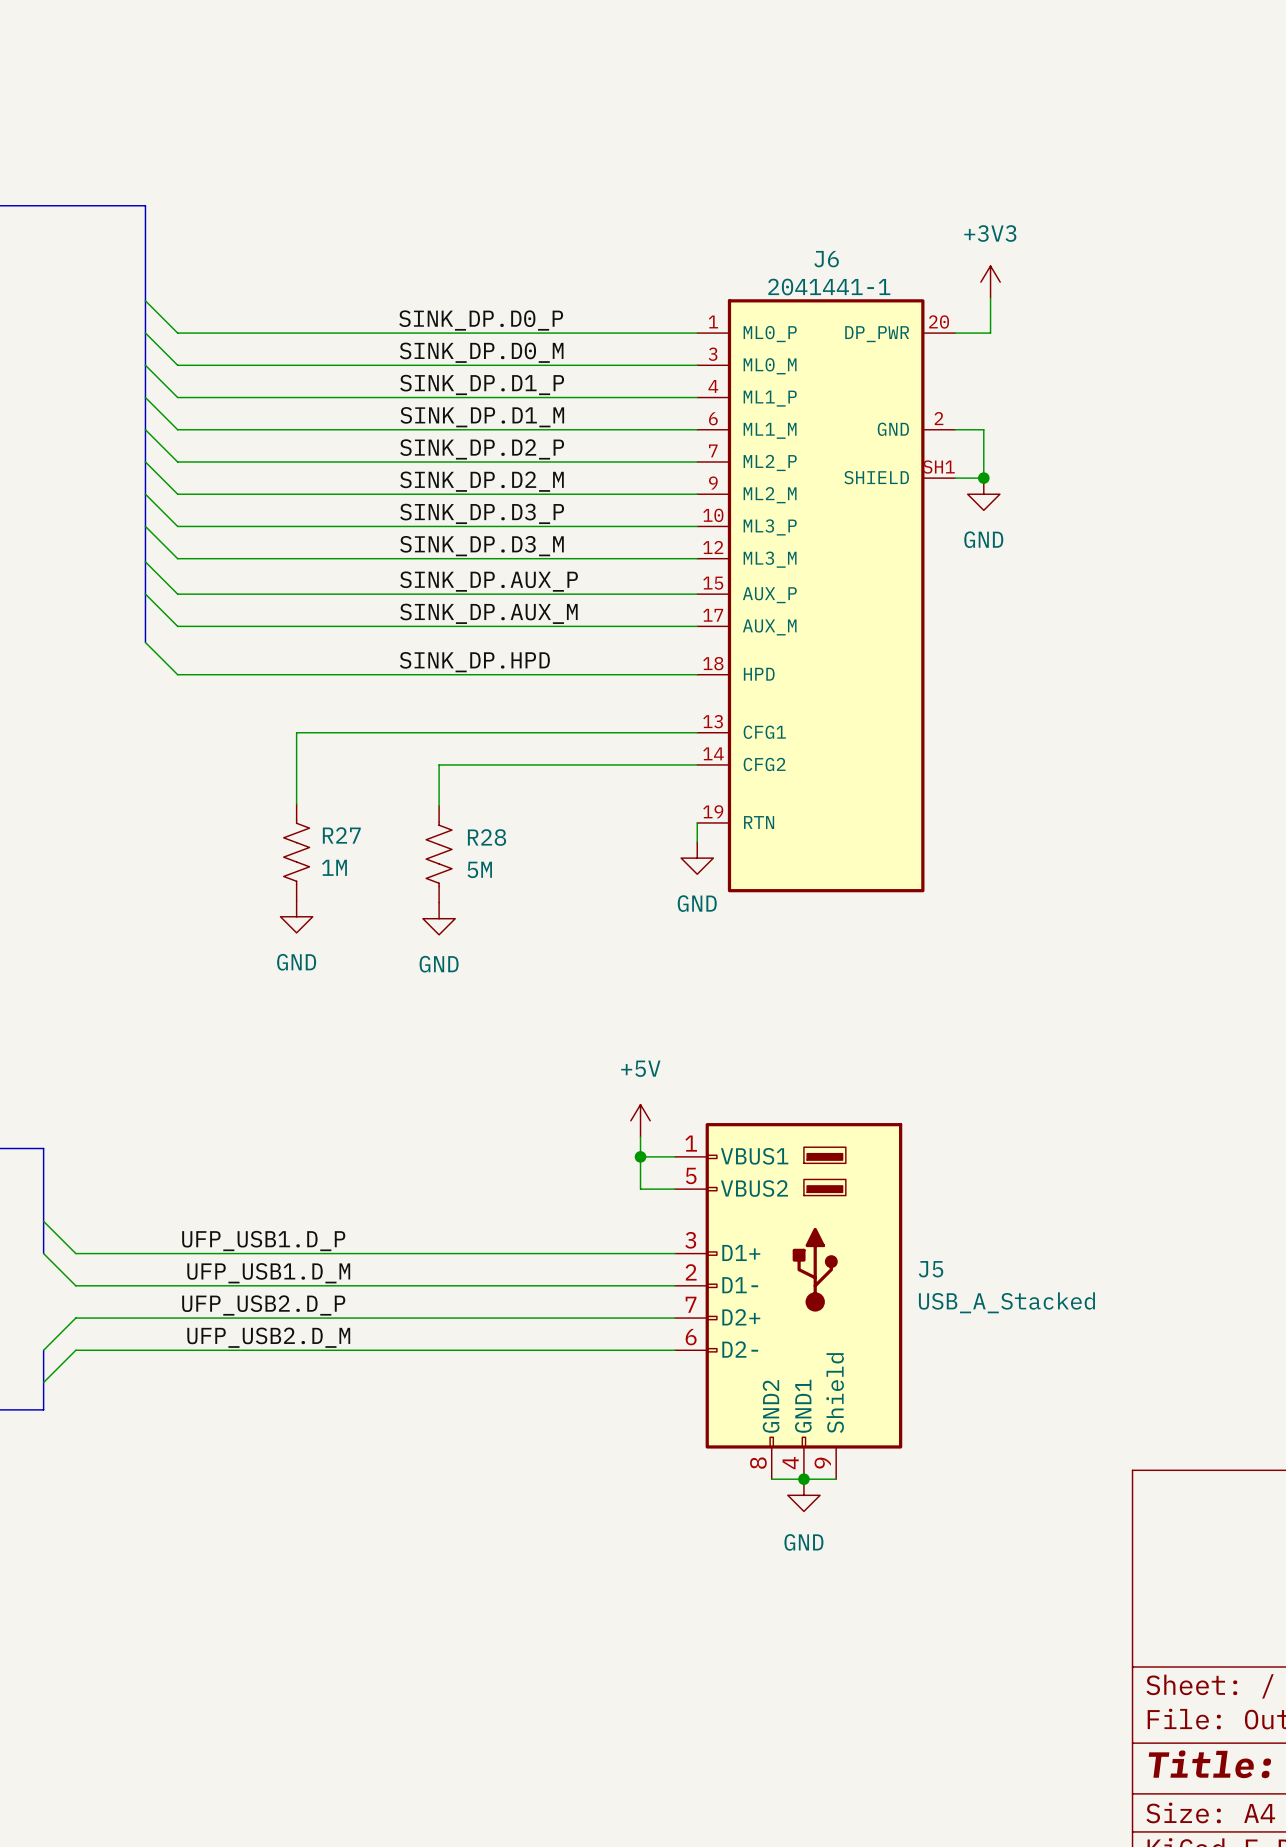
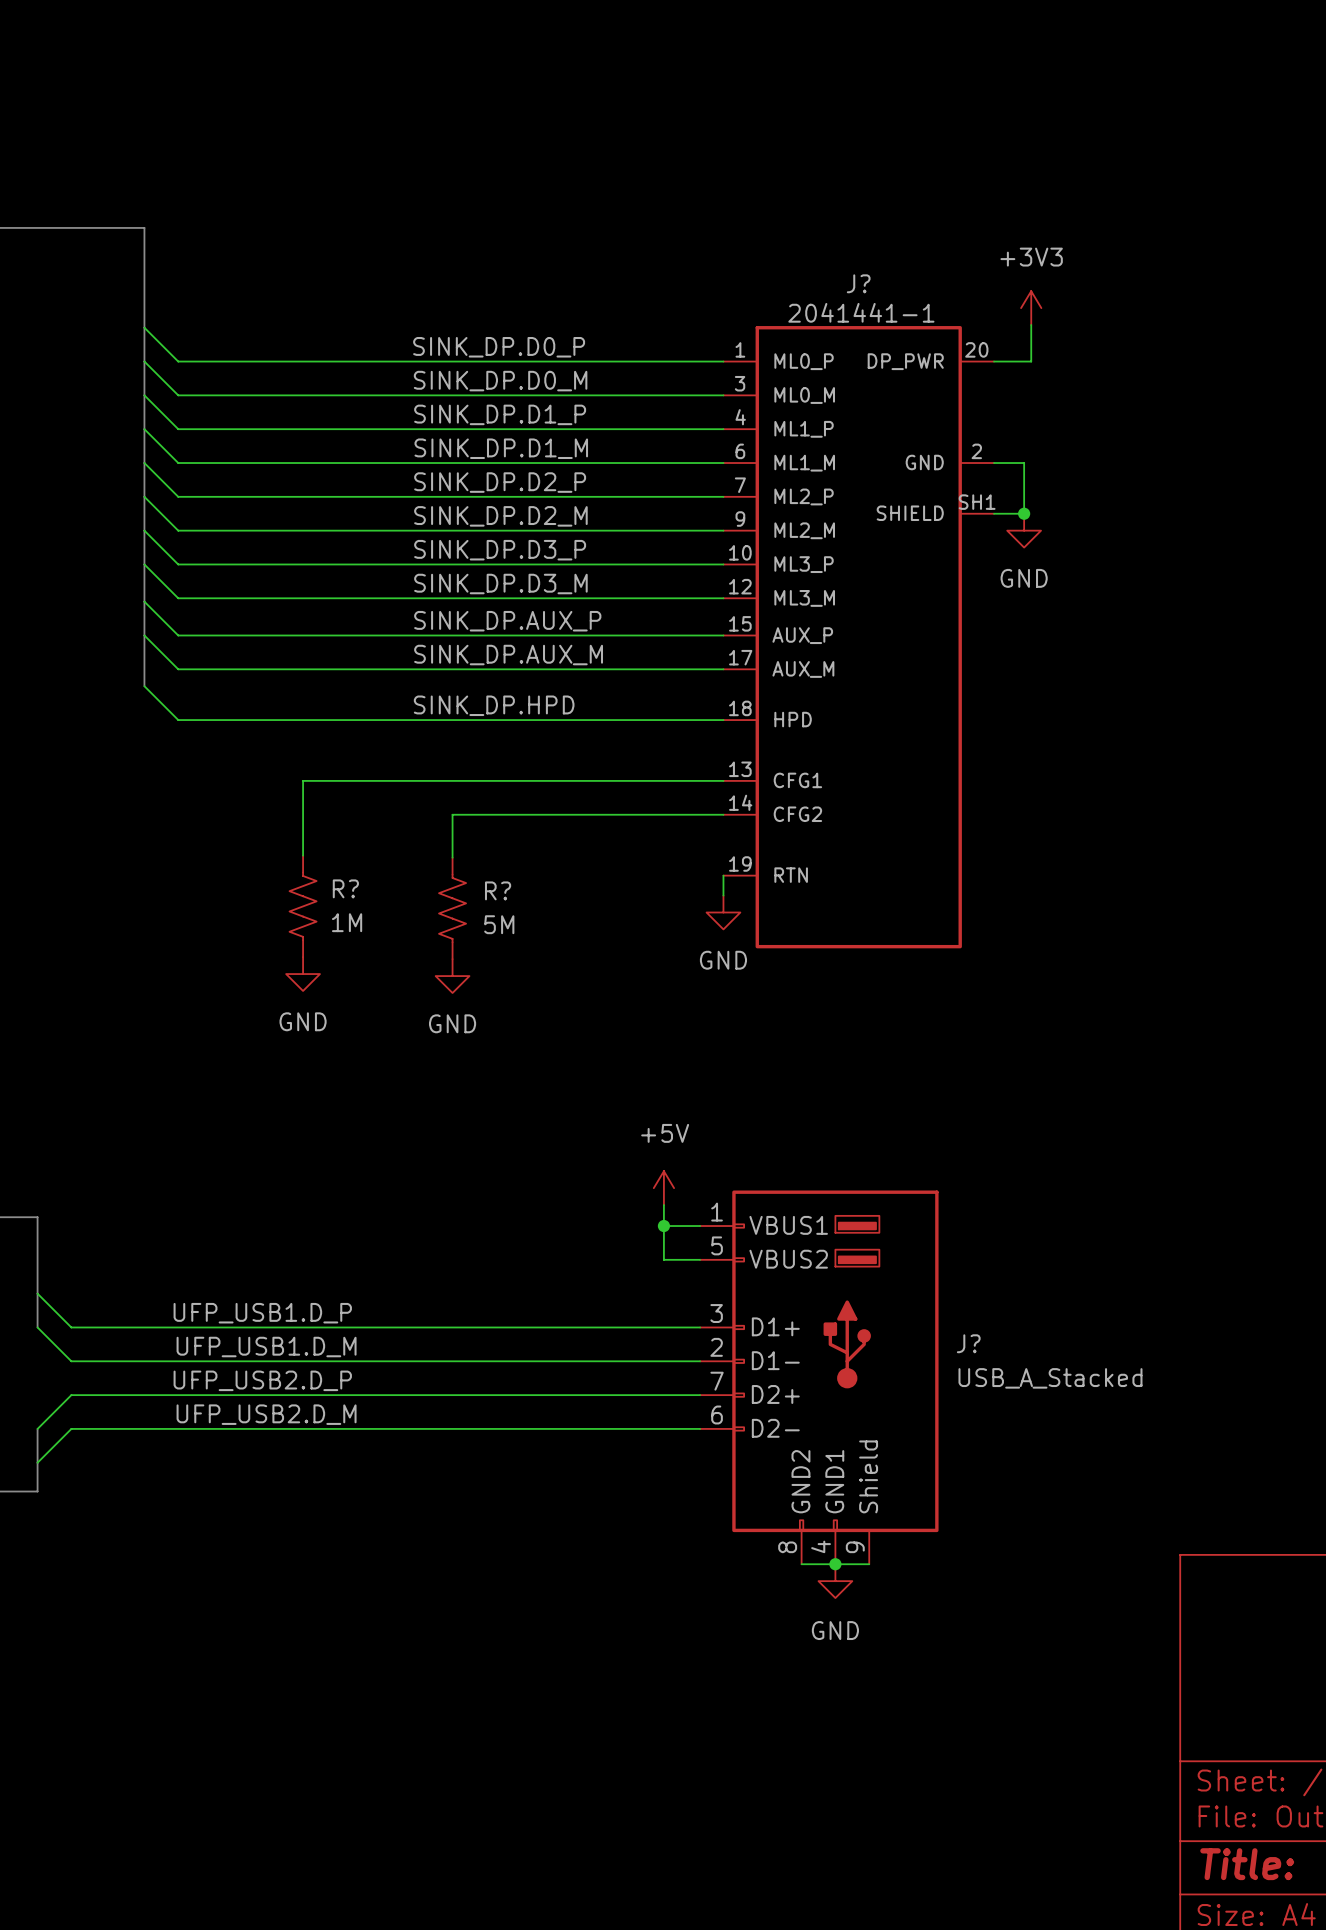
J6 name: J6 (826, 259) -> J? (858, 283)
R27 name: R27 (341, 835) -> R? (345, 888)
R28 name: R28 (487, 837) -> R? (498, 890)
J5 name: J5 (931, 1269) -> J? (968, 1343)

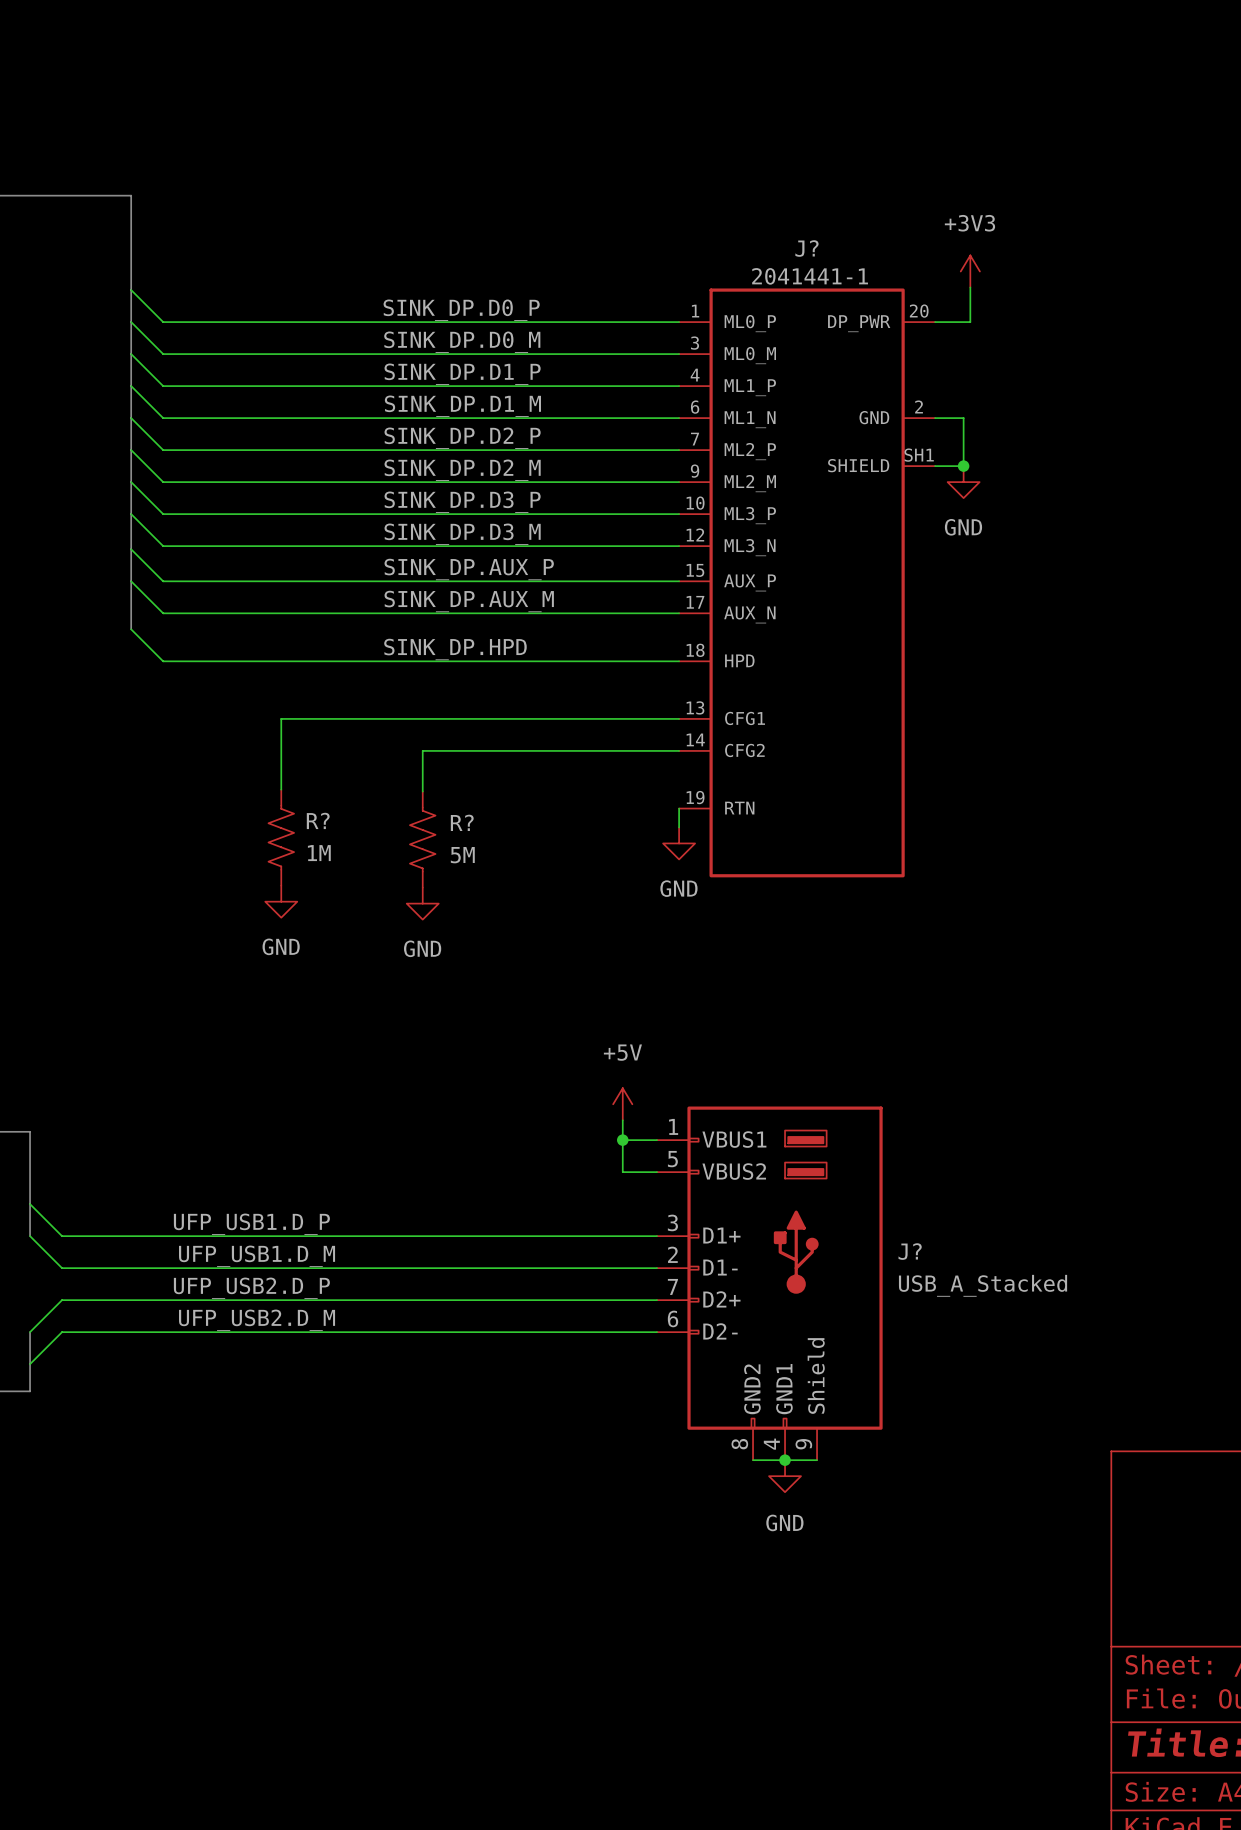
J? pin name: ML1_M (804, 463) -> ML1_N (750, 419)
J? pin name: ML3_M (804, 598) -> ML3_N (750, 547)
J? pin name: AUX_M (803, 669) -> AUX_N (749, 614)

